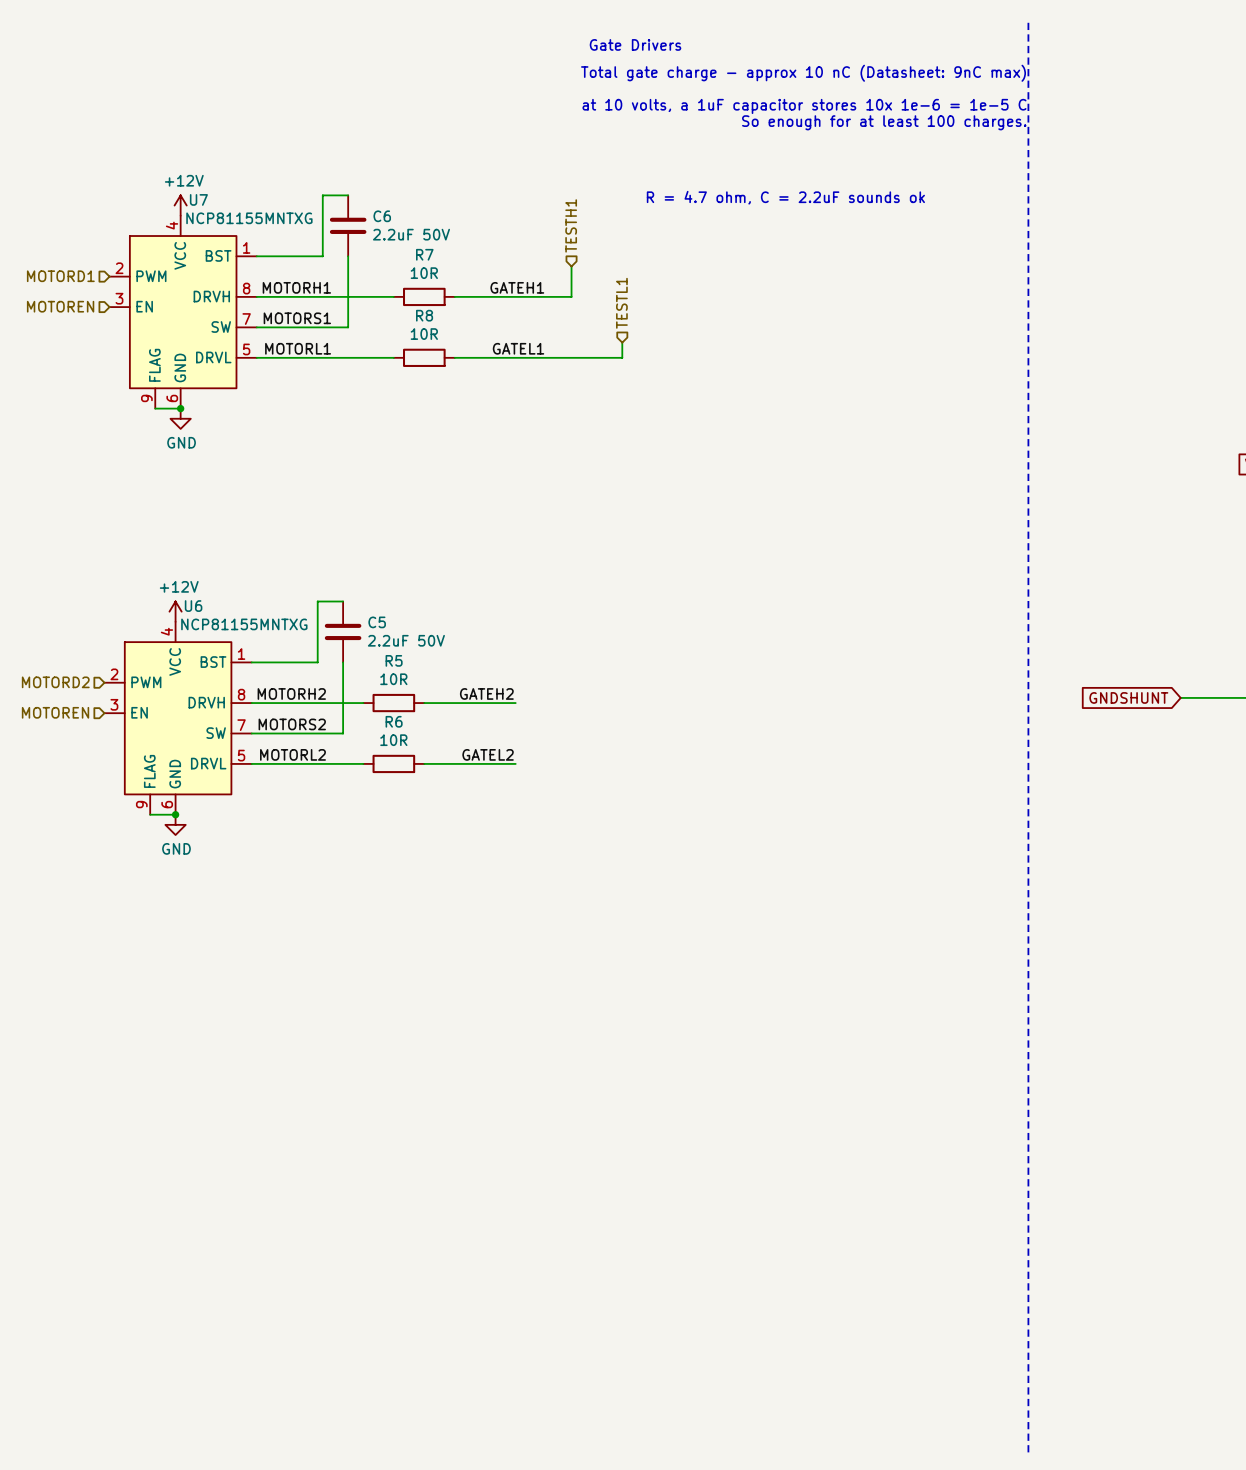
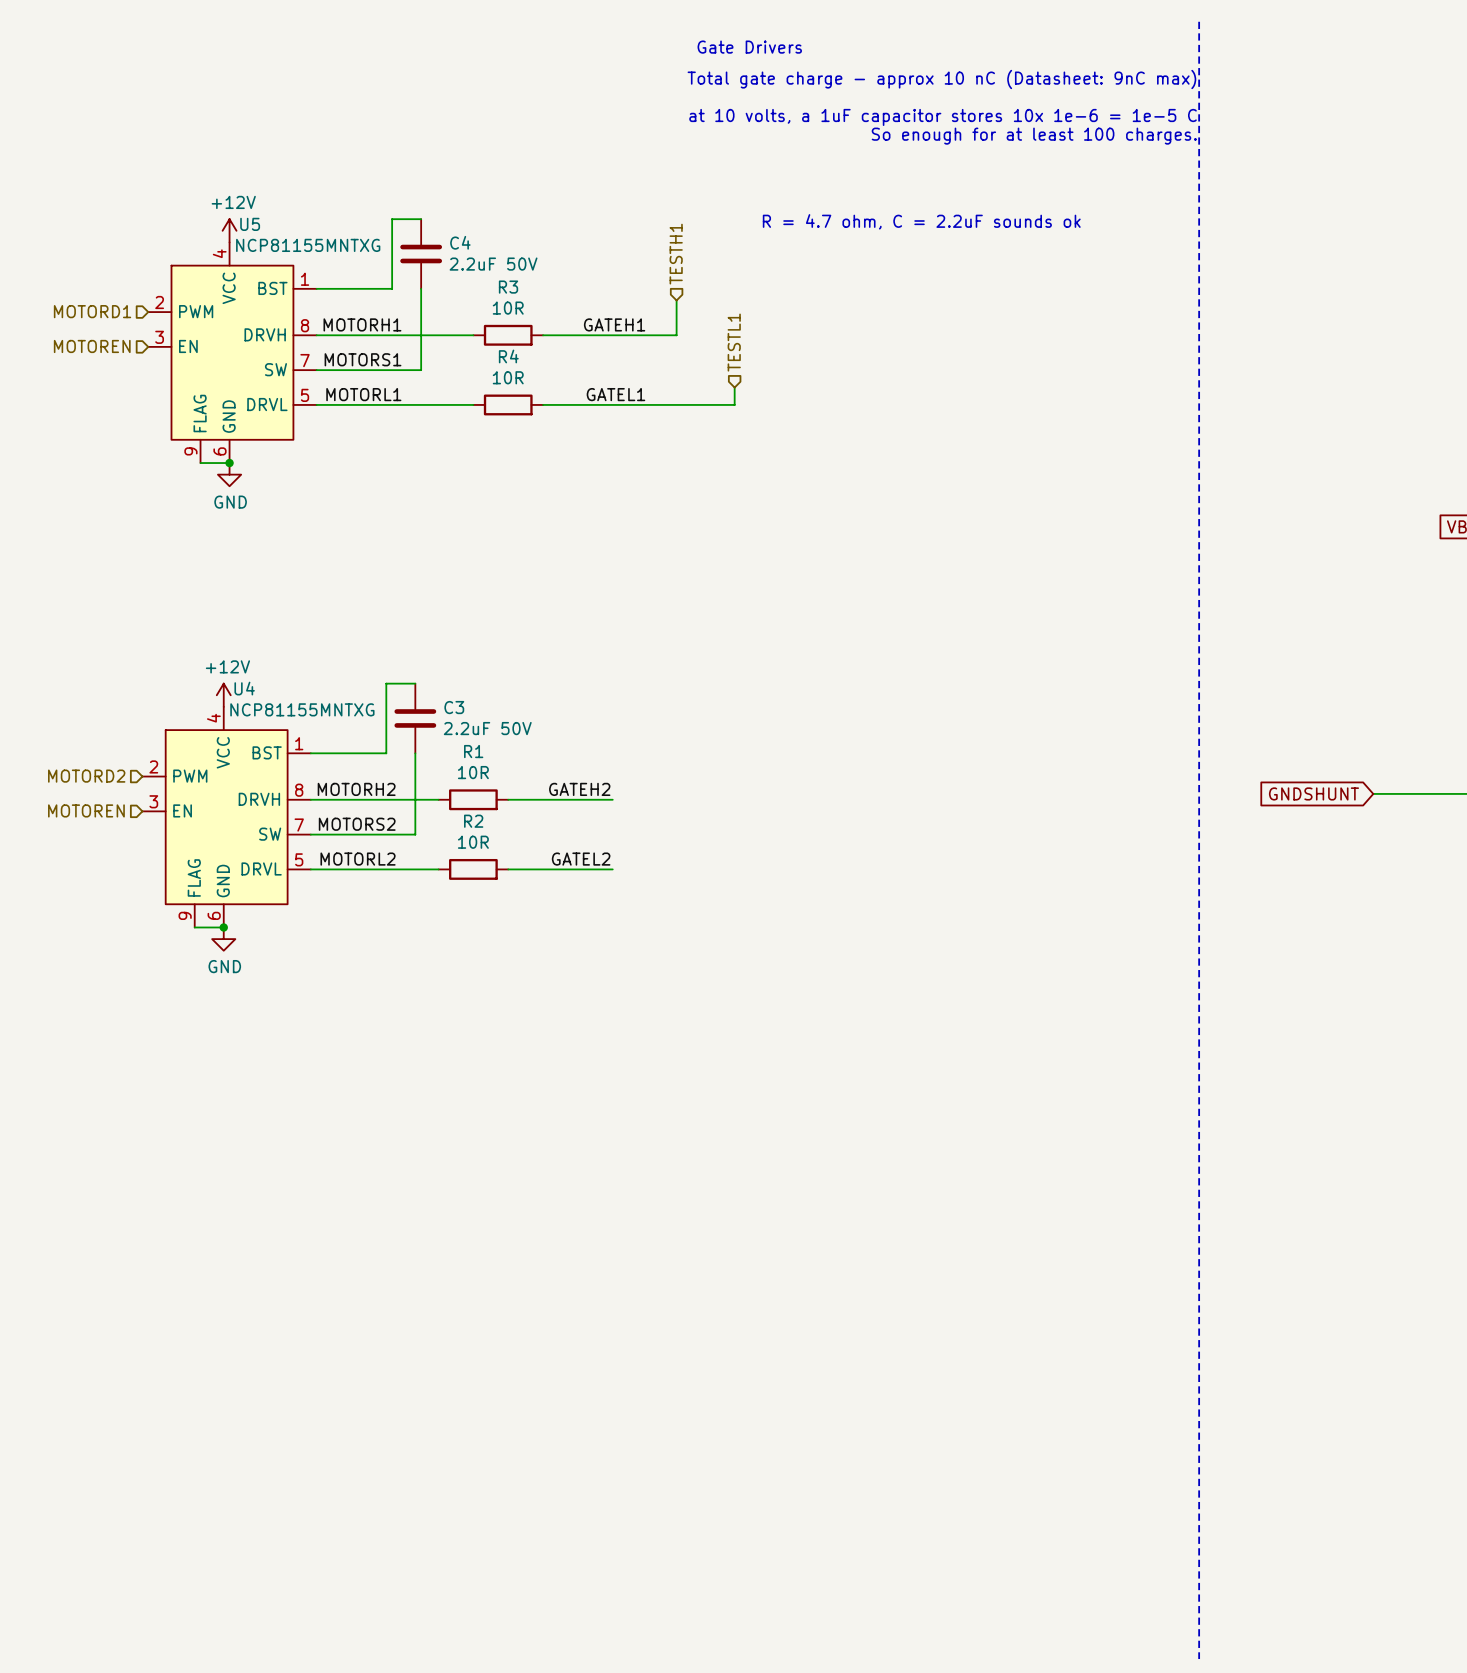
U7 name: U7 (198, 199) -> U5 (250, 224)
C6 name: C6 (382, 216) -> C4 (460, 242)
R7 name: R7 (424, 254) -> R3 (508, 287)
R8 name: R8 (424, 315) -> R4 (508, 356)
U6 name: U6 (193, 606) -> U4 (244, 688)
C5 name: C5 (377, 622) -> C3 (454, 707)
R5 name: R5 (394, 660) -> R1 (473, 751)
R6 name: R6 (394, 721) -> R2 (473, 821)

